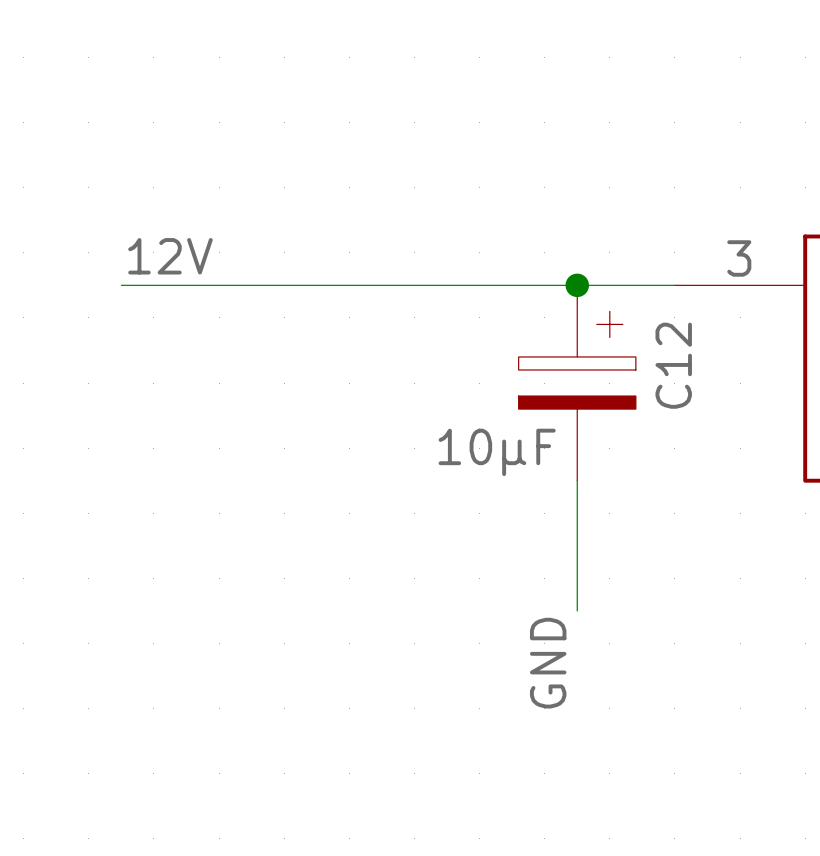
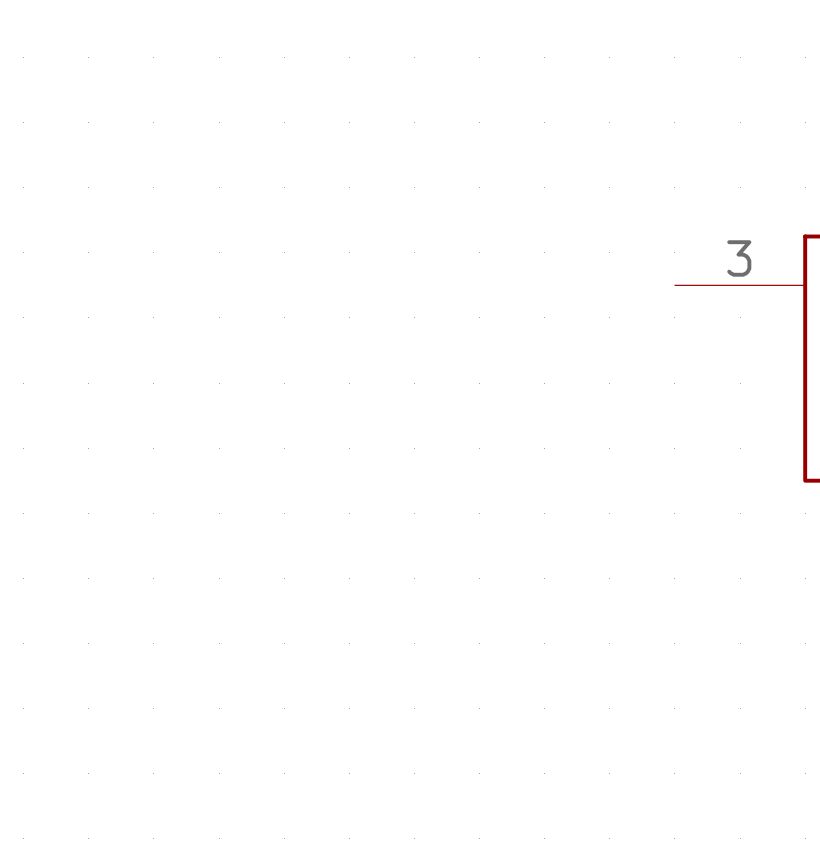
label: 12V (170, 256) -> none
wire: (121, 285) (674, 285) -> none
junction: (577, 285) -> none
C12: (577, 383) -> none
wire: (577, 480) (577, 610) -> none
label: GND (548, 663) -> none

